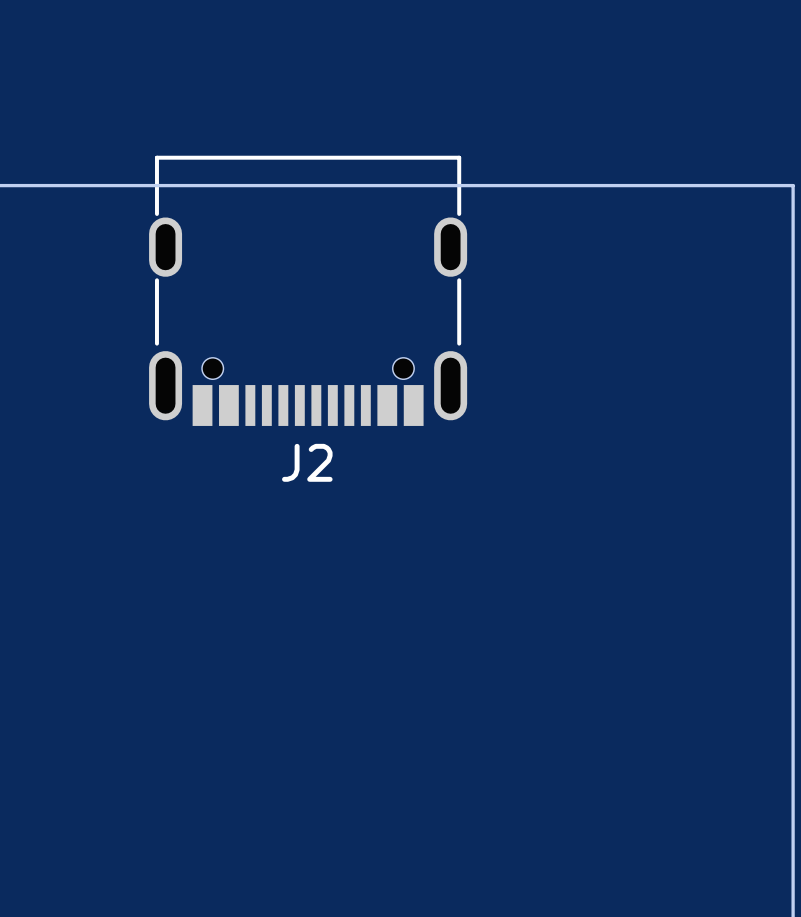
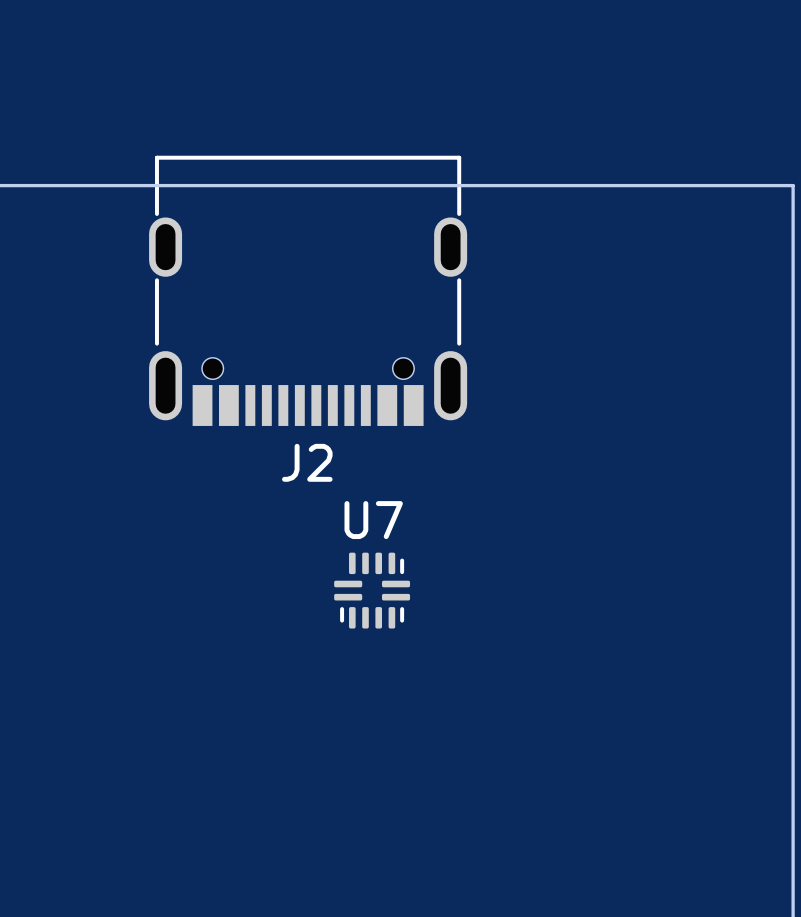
U7: none -> (372, 590)

